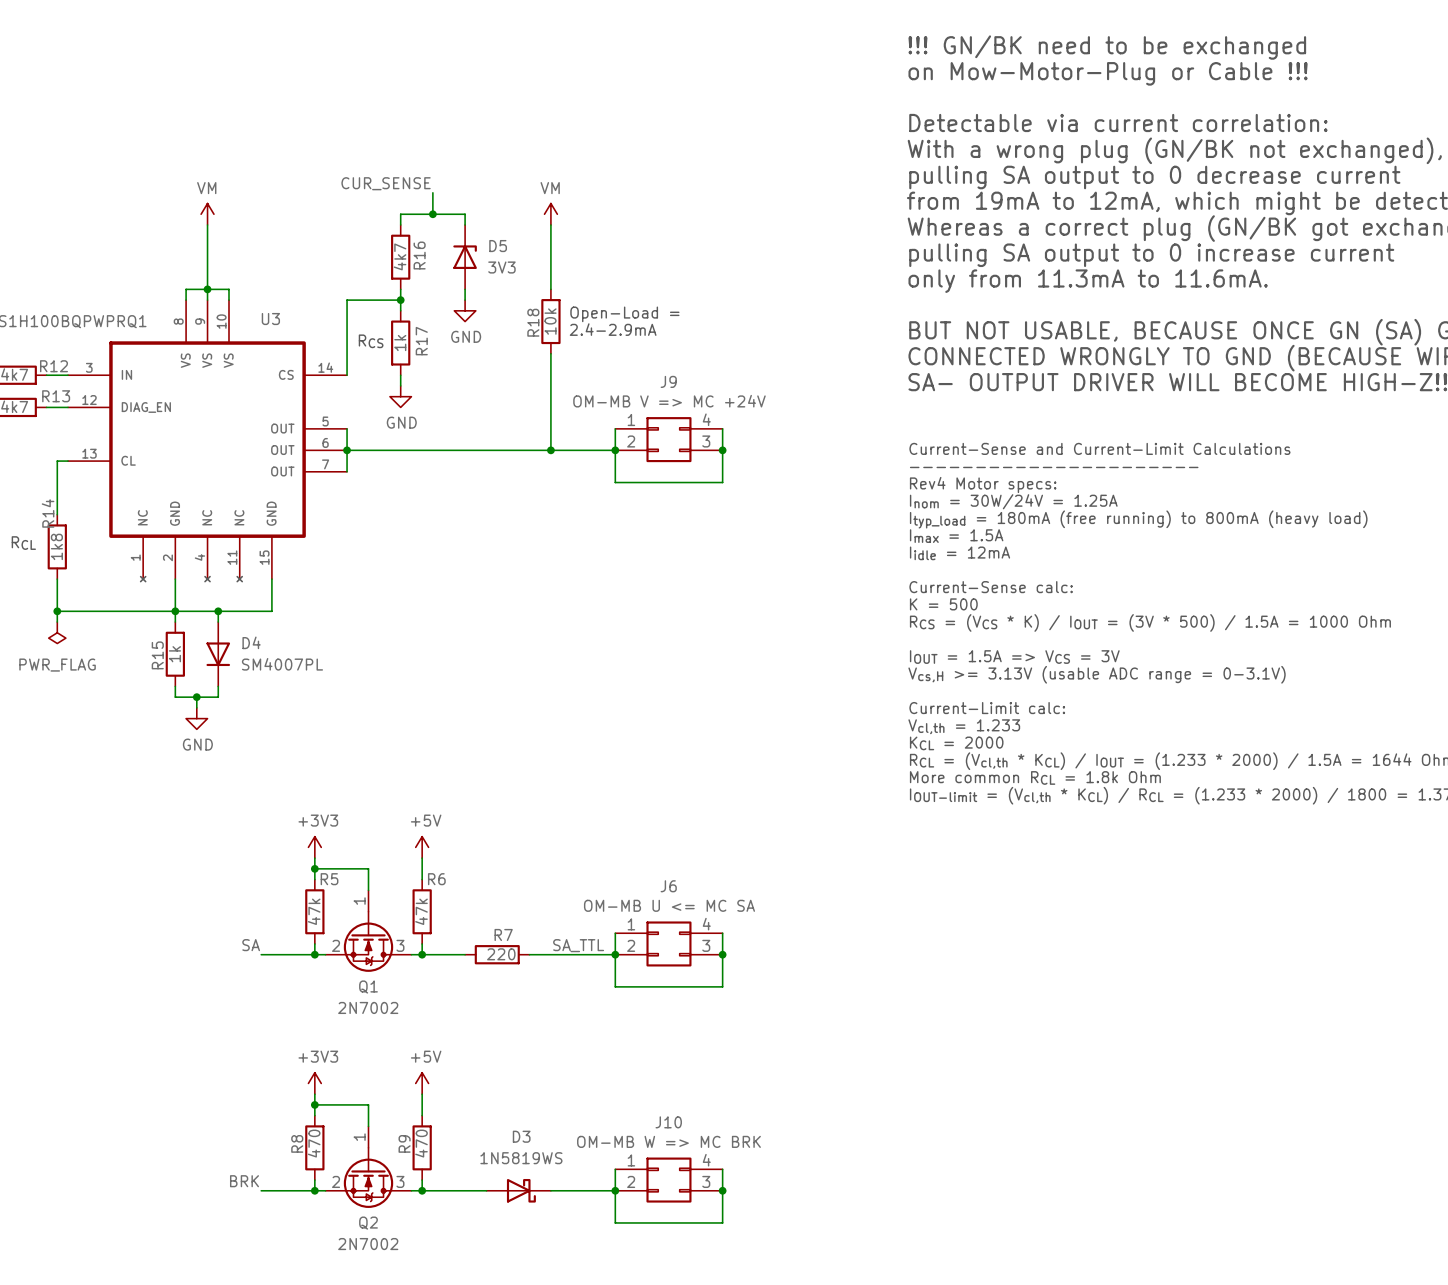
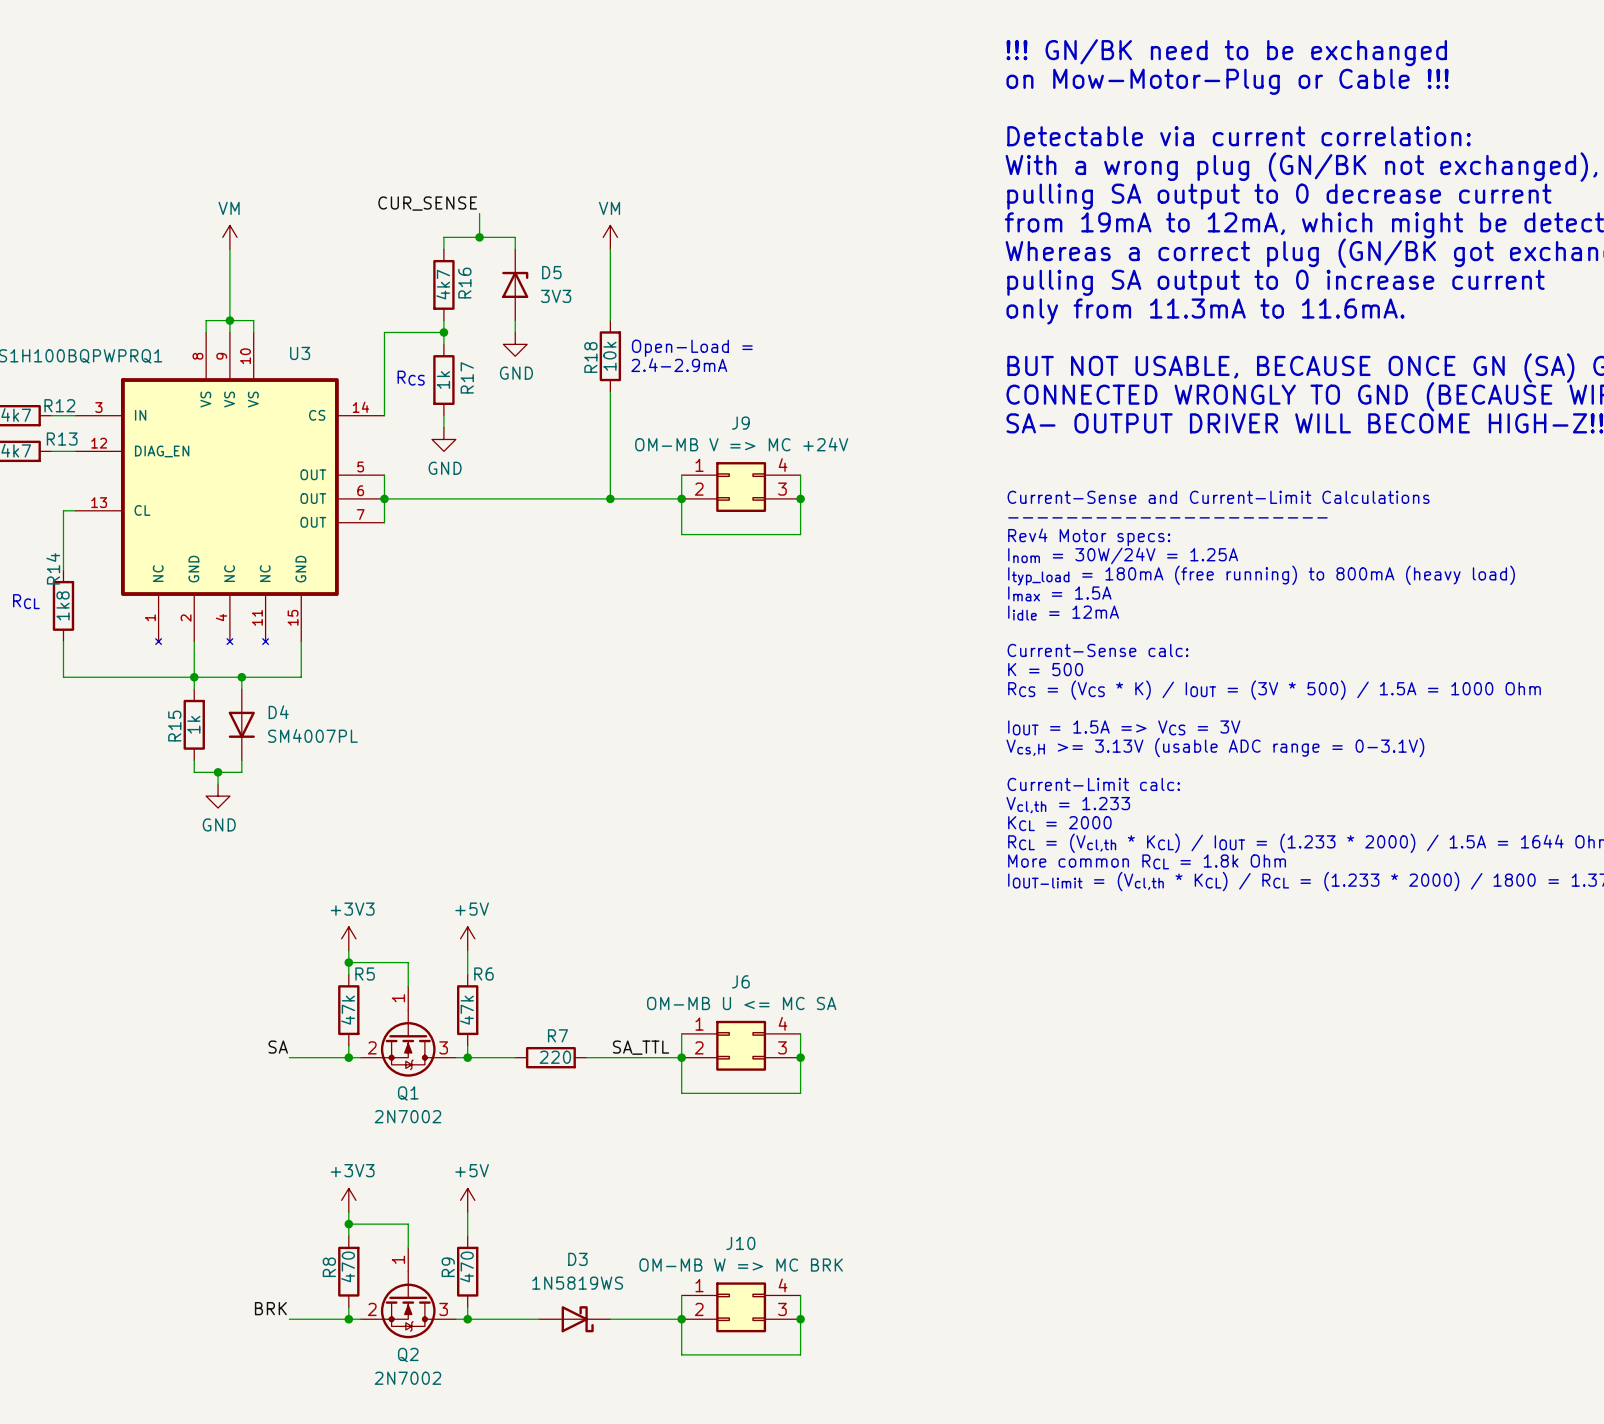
wire: (57, 611) (57, 622) -> none
junction: (57, 611) -> none
power symbol: PWR_FLAG (57, 632) -> none

